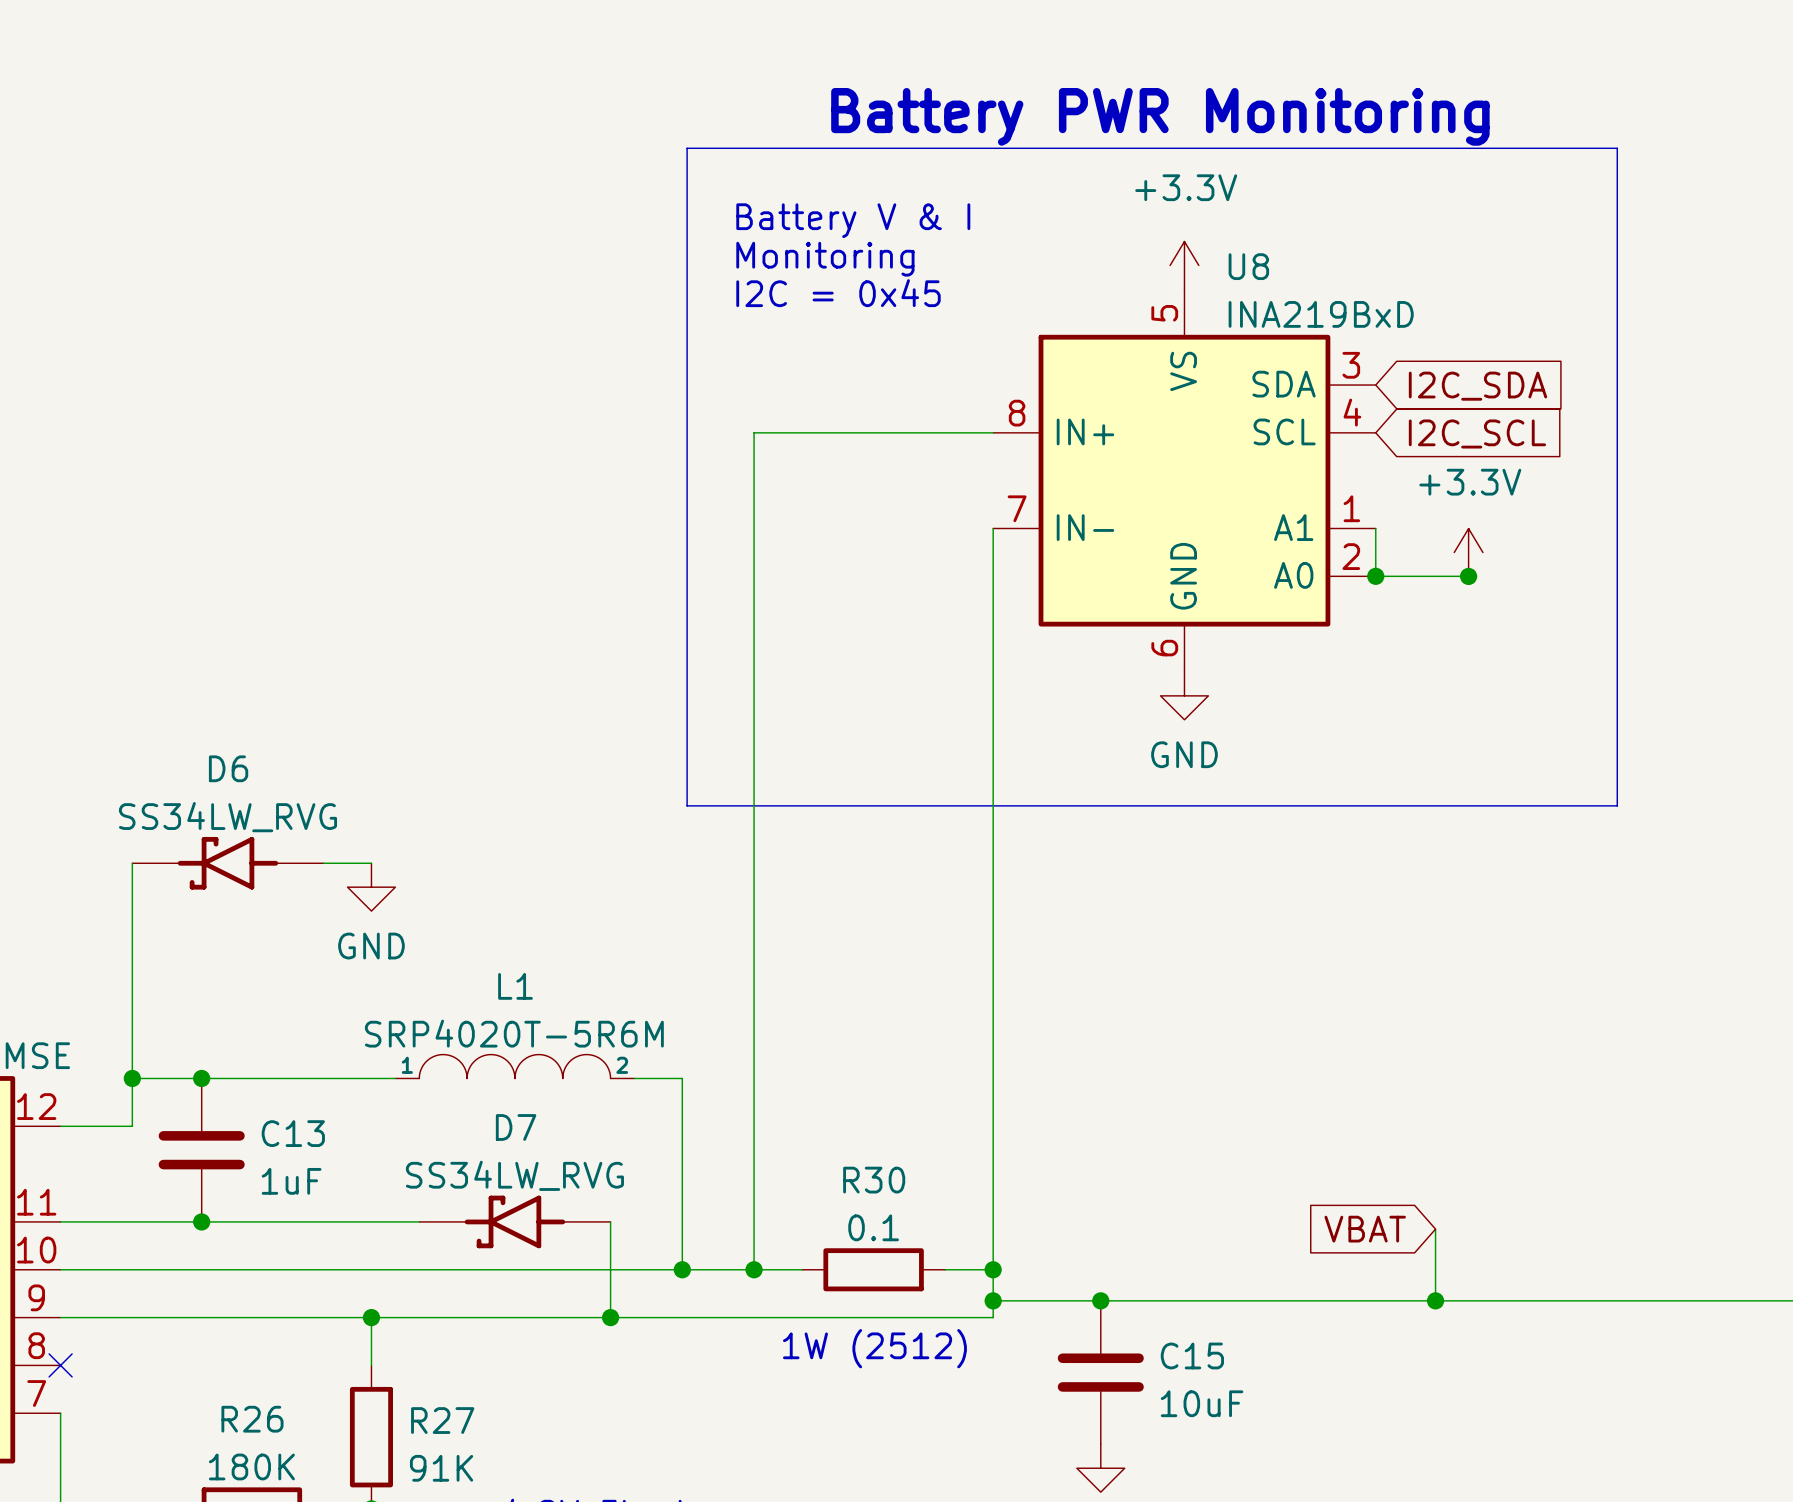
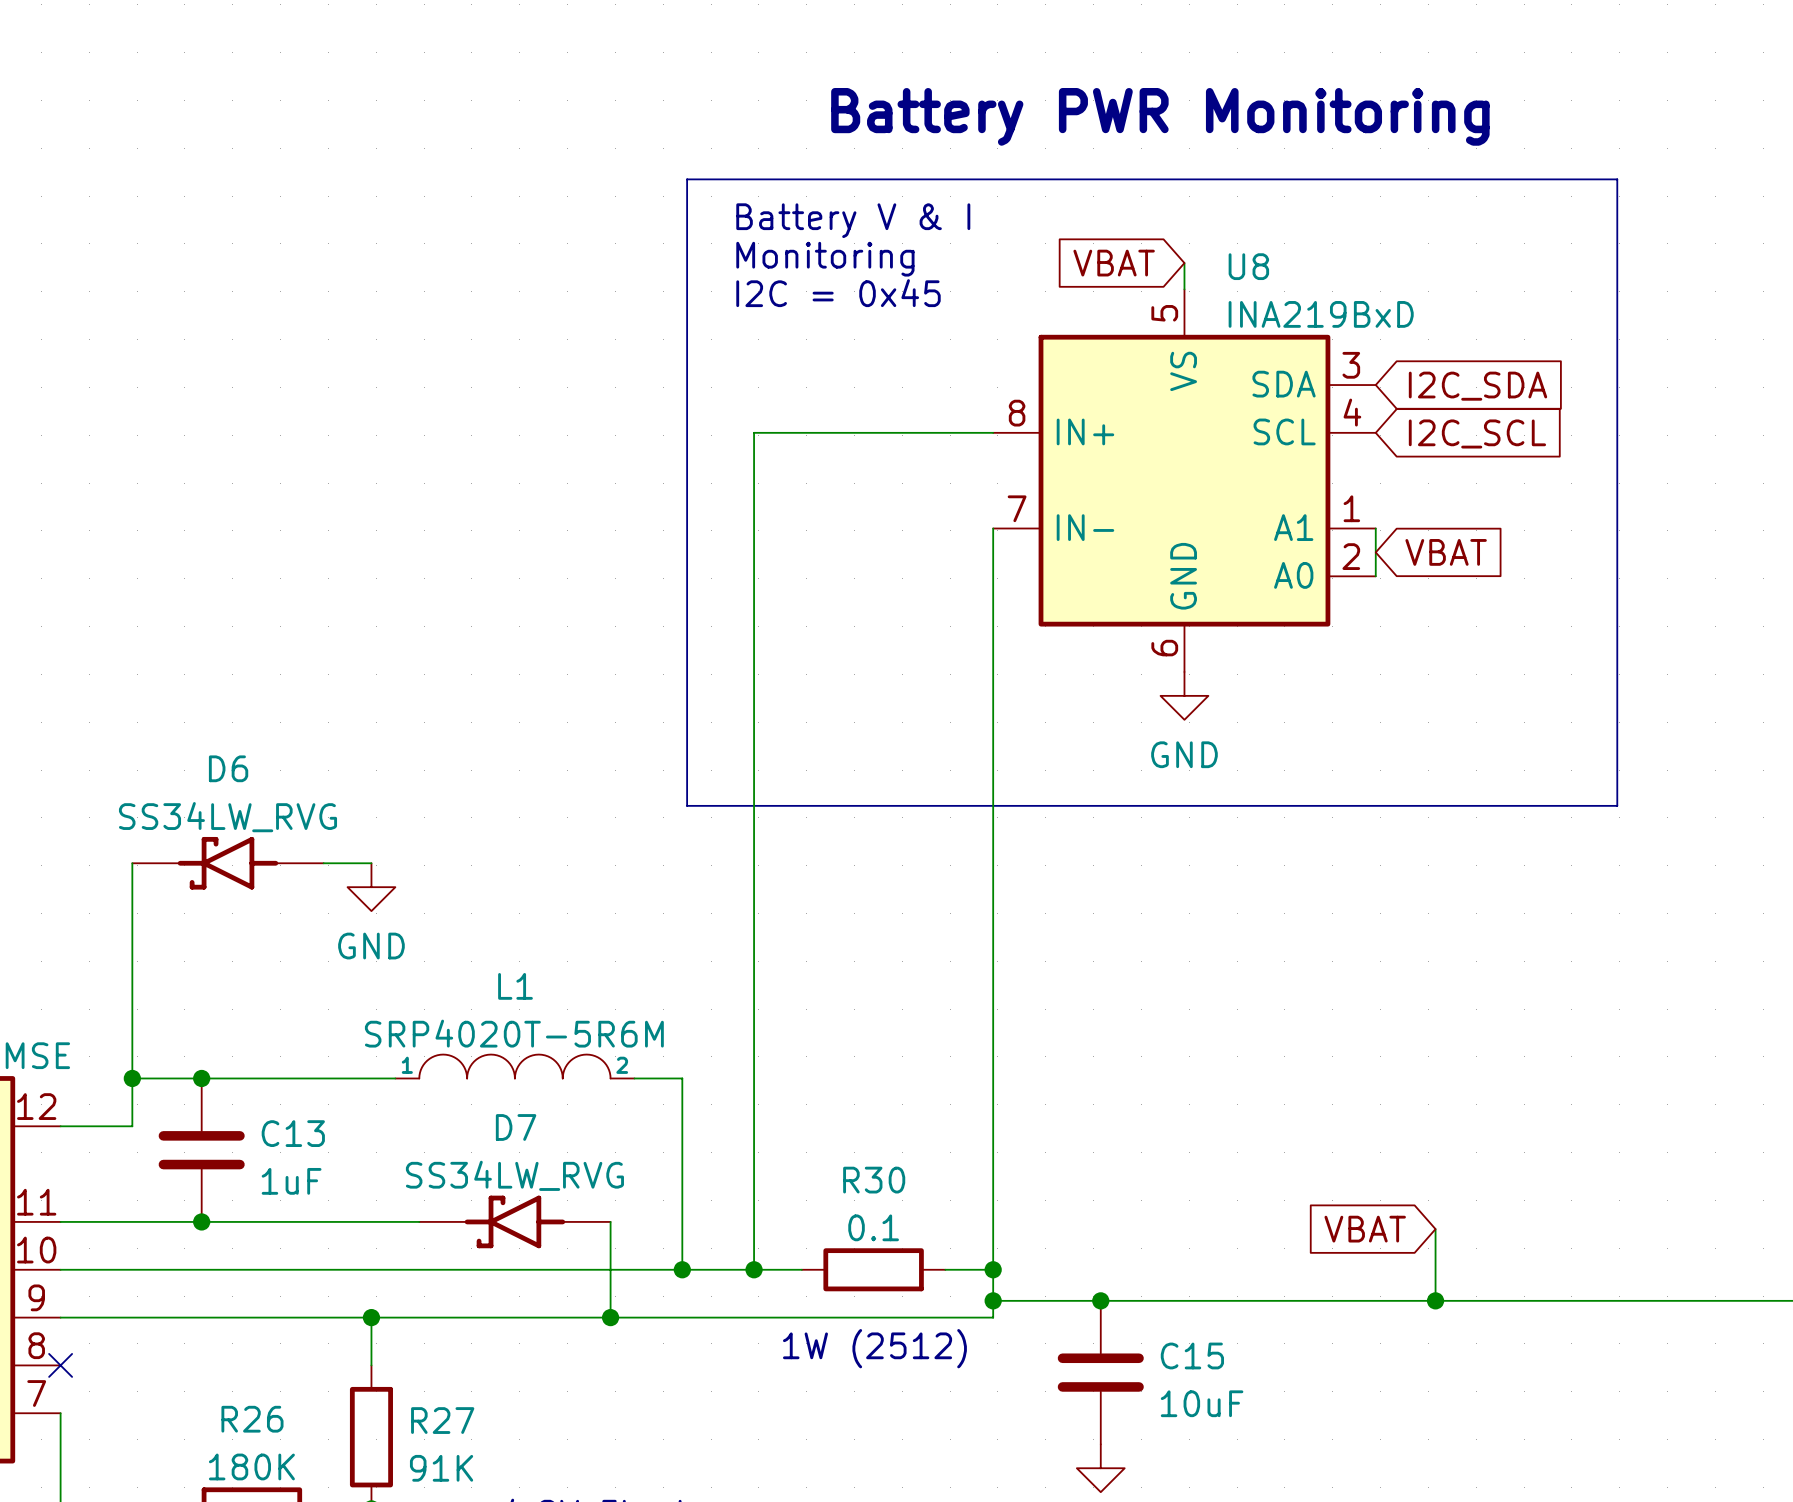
line: (687, 179) (687, 148) (1617, 148) (1617, 179) -> (687, 179) (1617, 179)
global label: none -> VBAT (1114, 263)
power symbol: +3.3V (1184, 265) -> none
global label: none -> VBAT (1446, 552)
power symbol: +3.3V (1468, 552) -> none
wire: (1375, 576) (1468, 576) -> none
junction: (1375, 576) -> none
junction: (1468, 576) -> none

